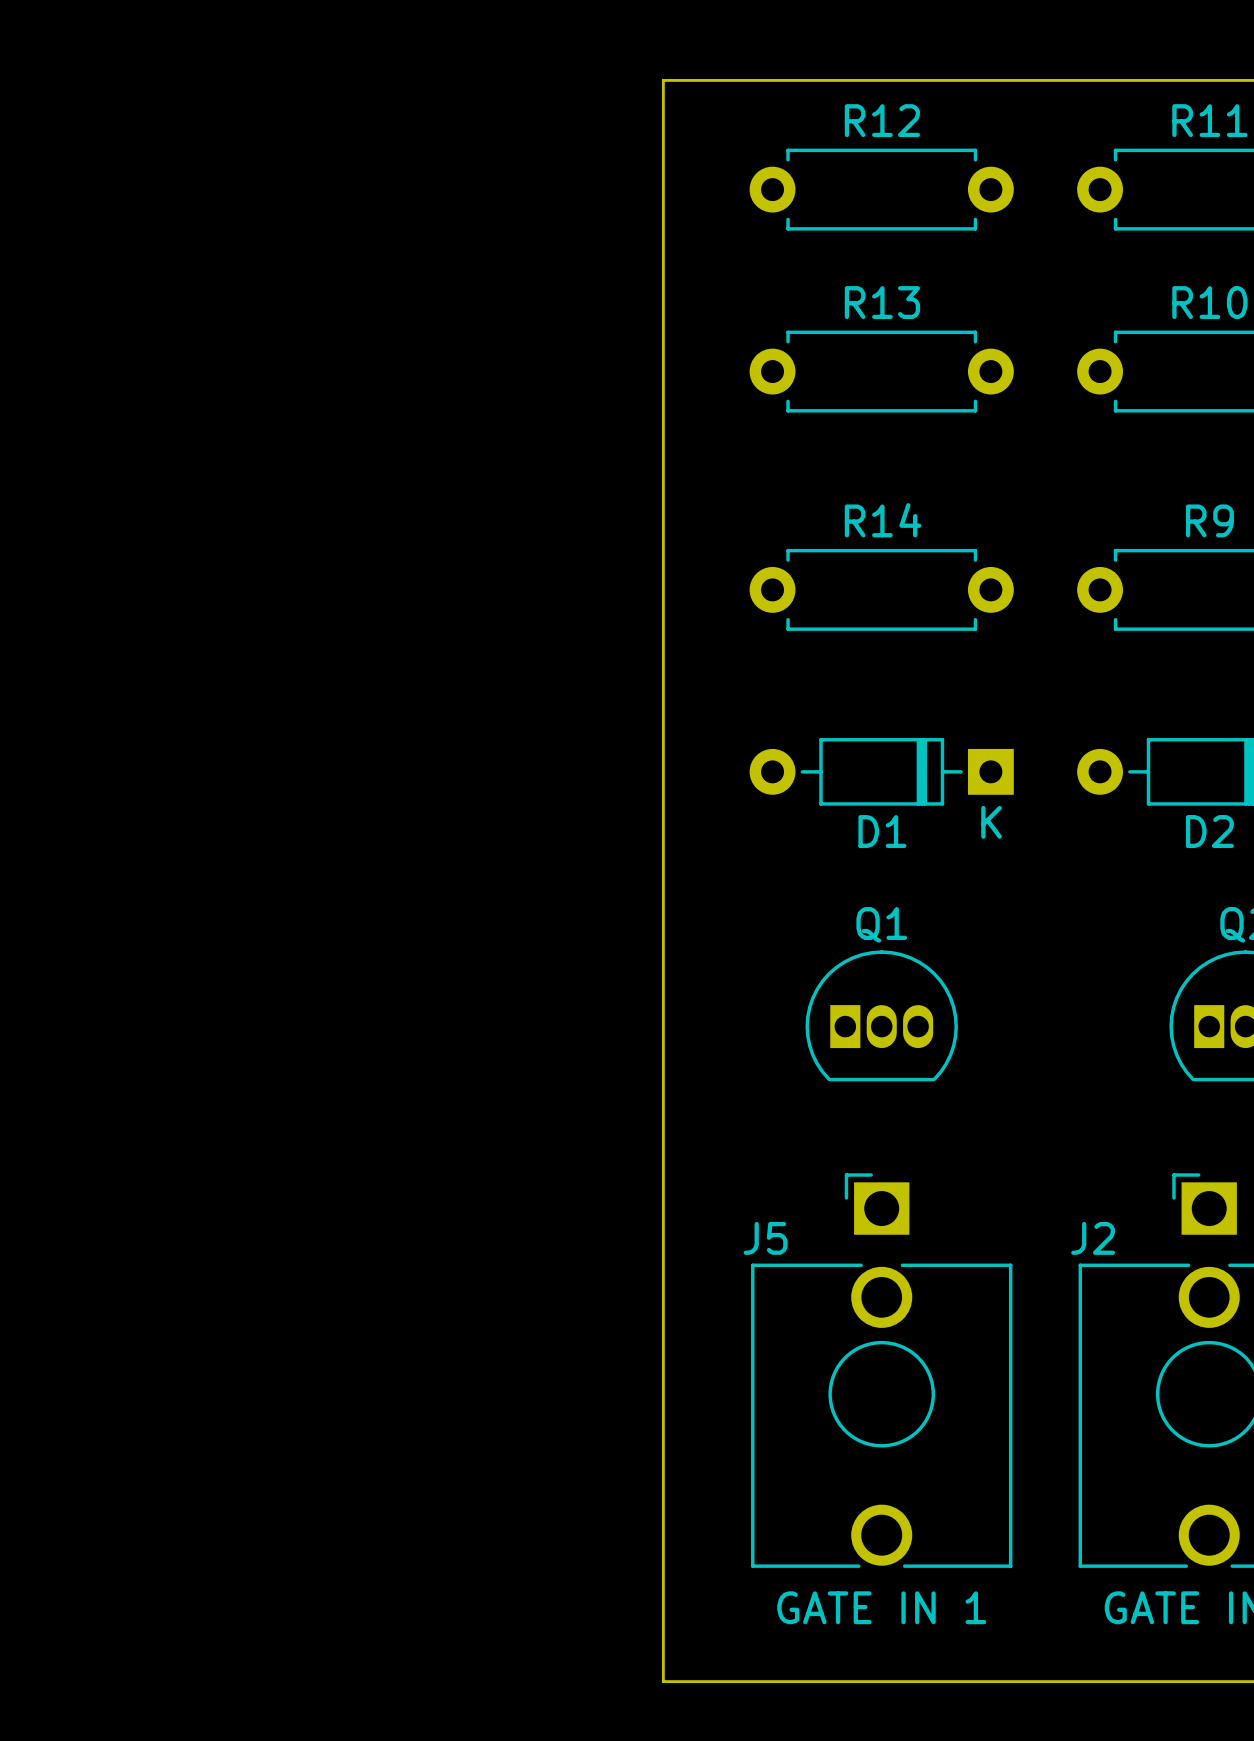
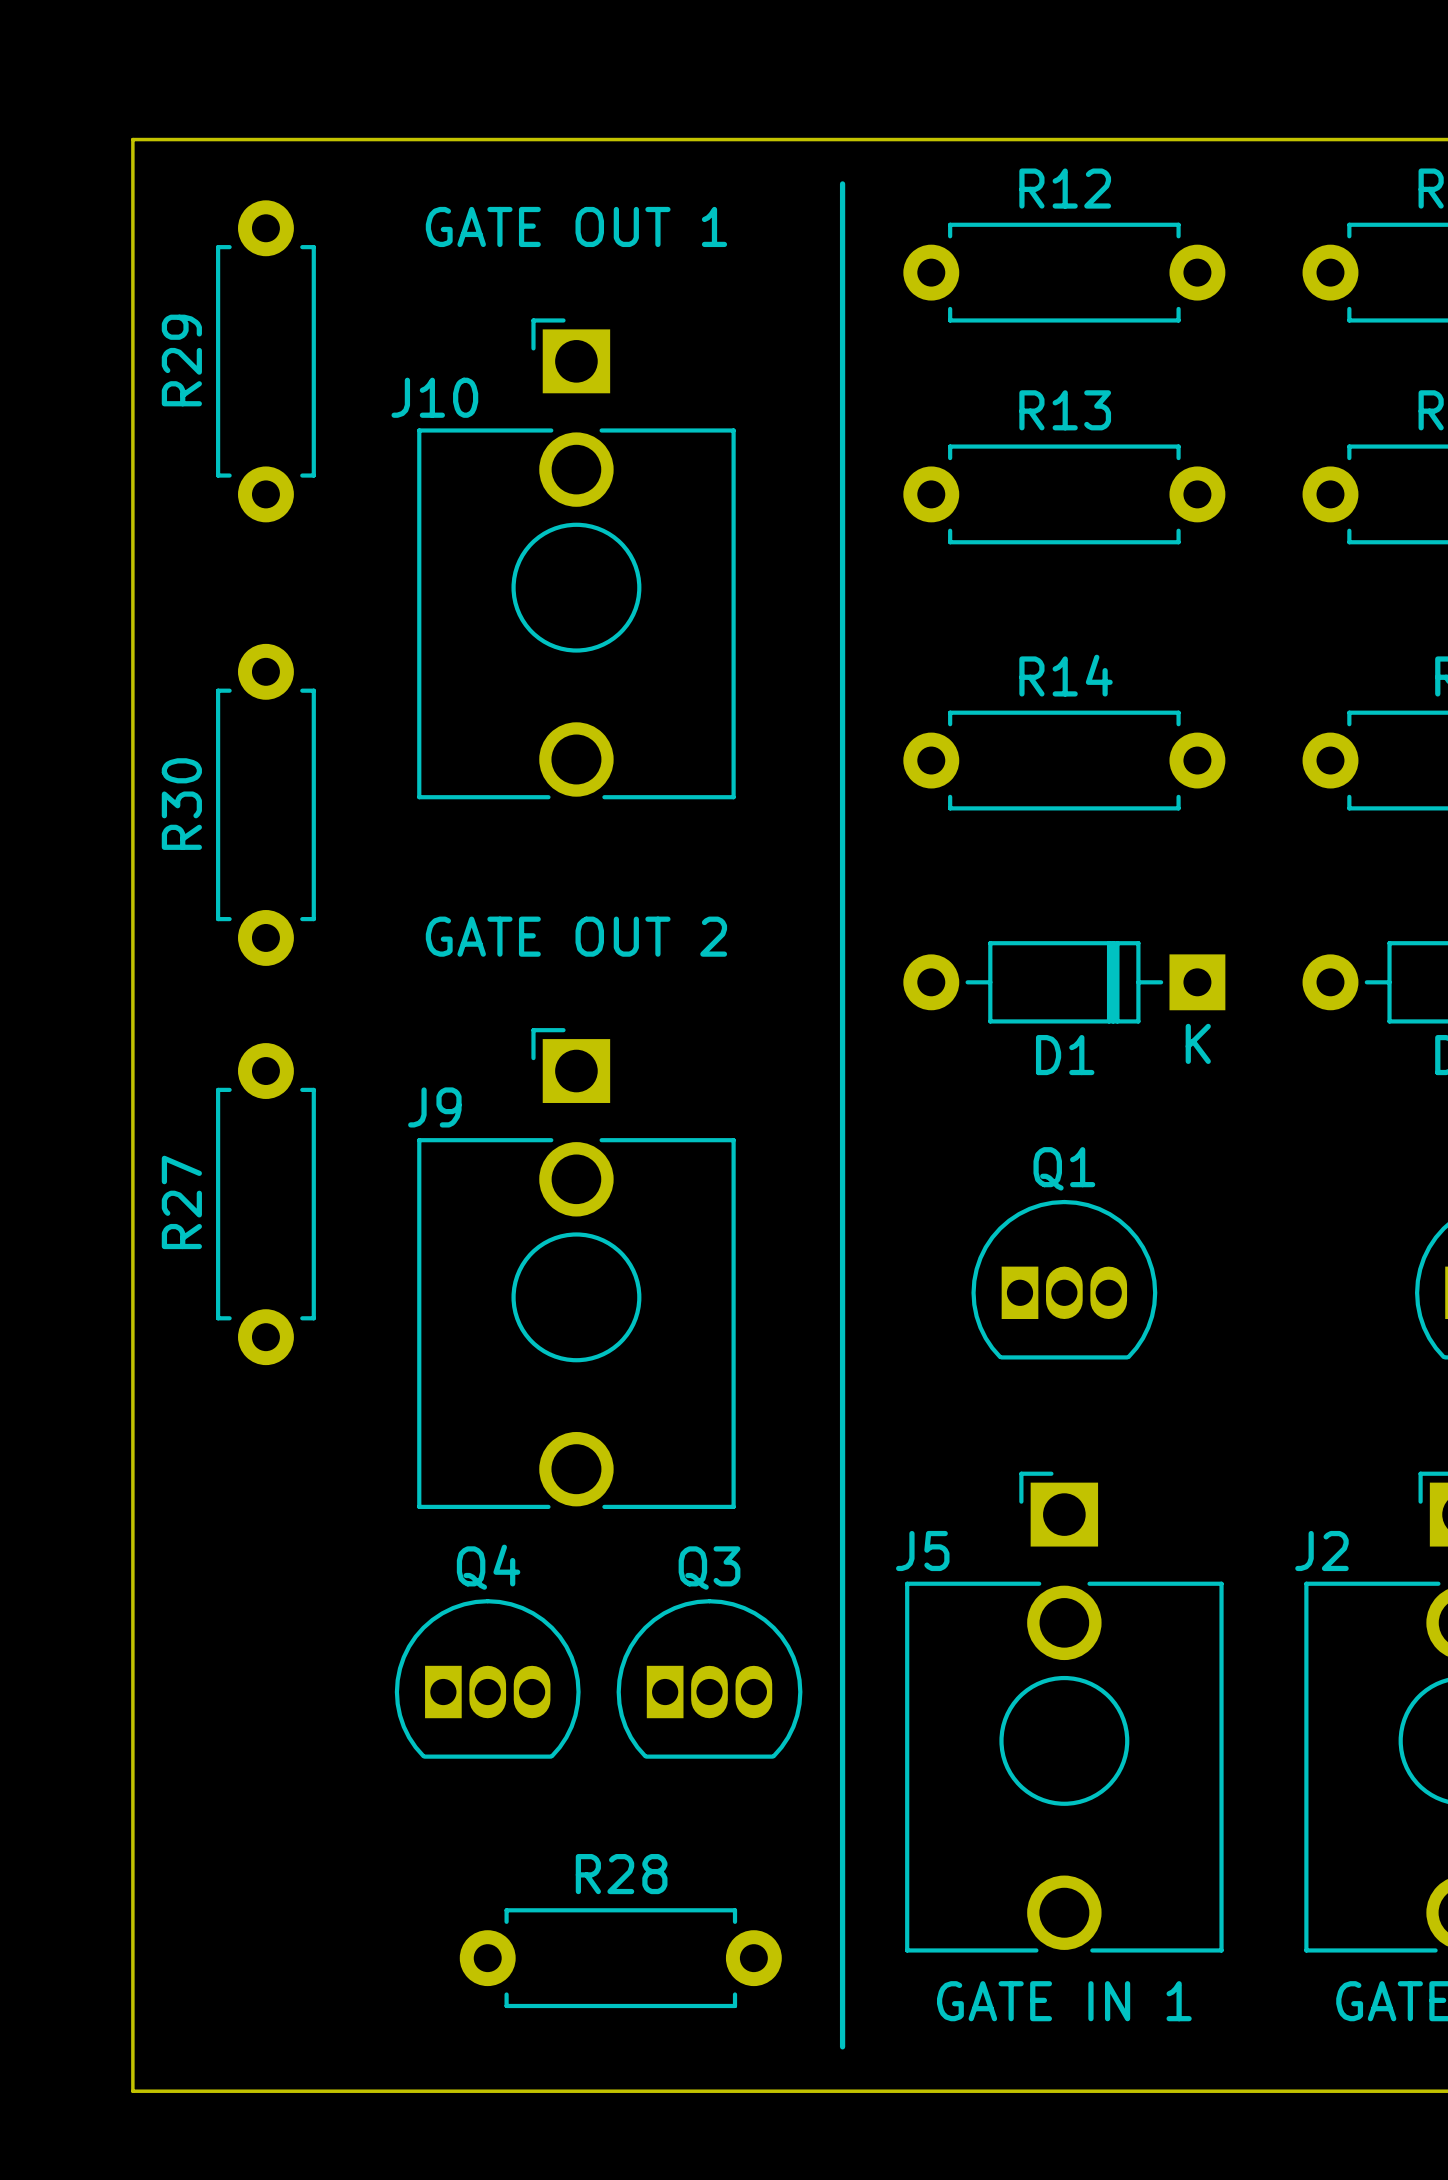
board edge: (663, 80) (663, 1681) -> (798, 139) (132, 139) (132, 2091) (798, 2091)
line: none -> (842, 183) (842, 2046)
text: none -> GATE OUT 1 (576, 226)
R29: none -> (265, 361)
J10: none -> (576, 558)
R30: none -> (265, 804)
text: none -> GATE OUT 2 (576, 936)
R27: none -> (265, 1204)
J9: none -> (576, 1268)
Q4: none -> (487, 1678)
Q3: none -> (709, 1678)
R28: none -> (620, 1958)

